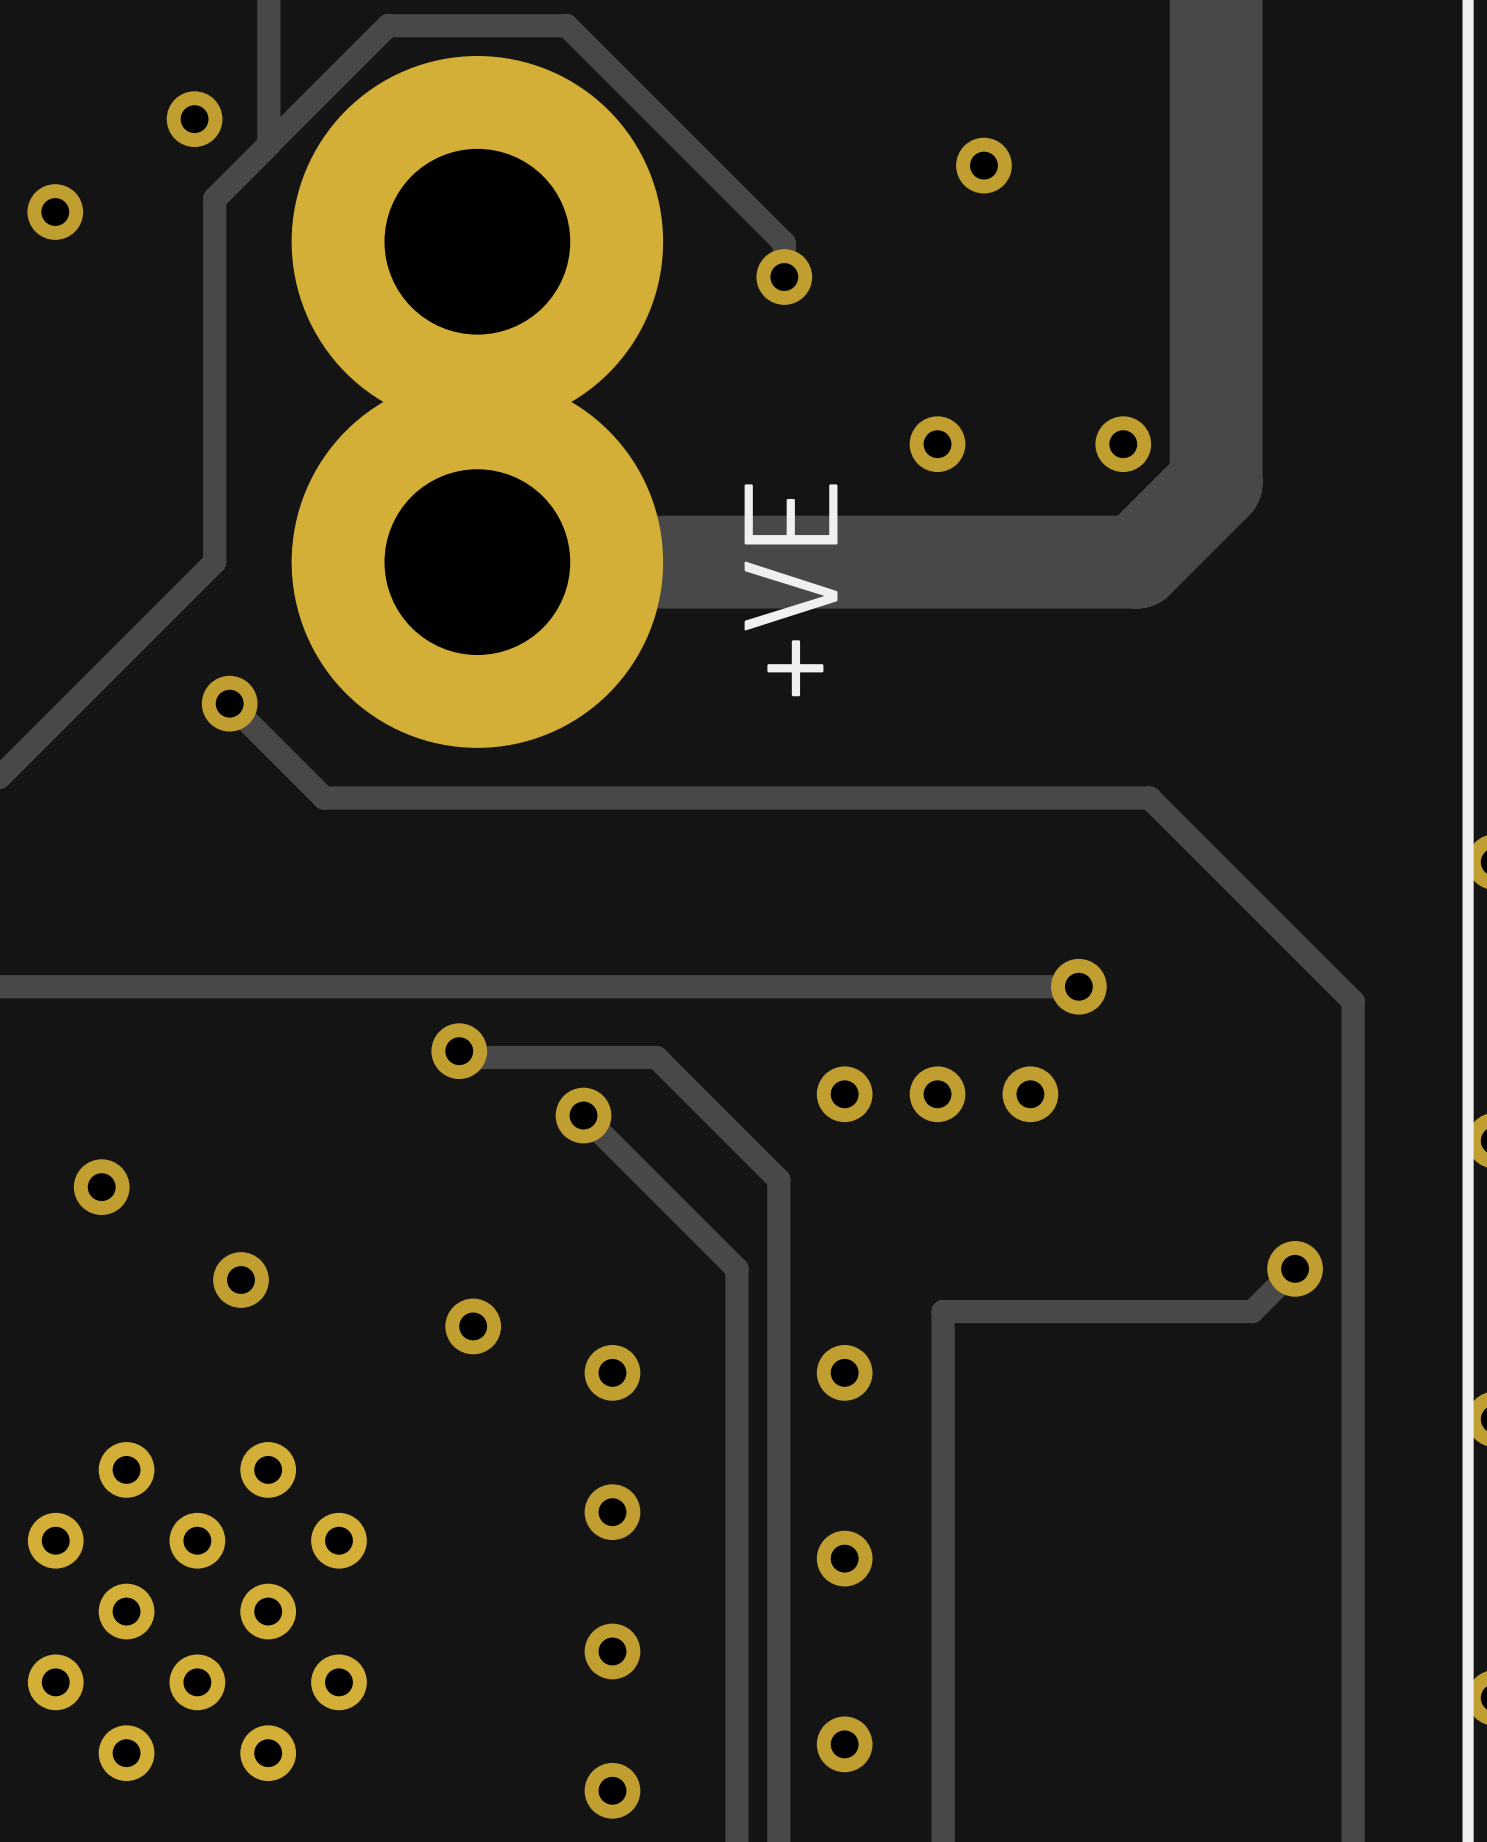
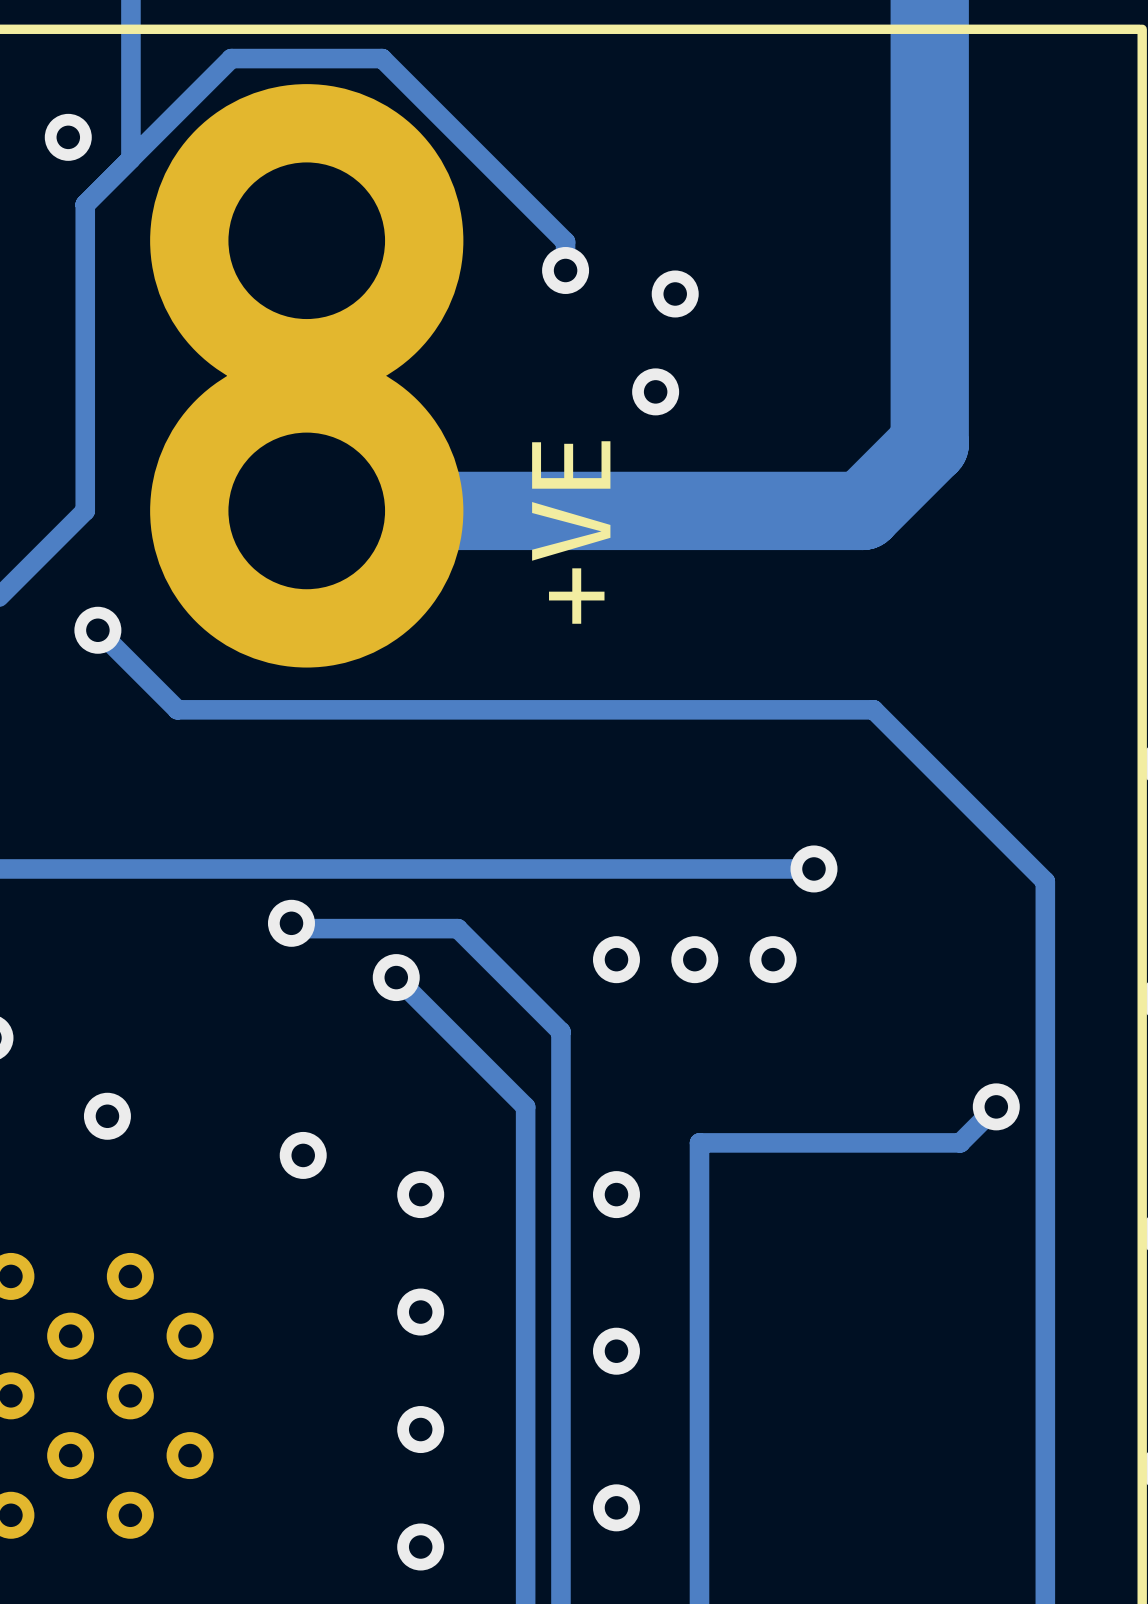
via: (983, 165) -> none
via: none -> (675, 293)
via position: (937, 444) -> (655, 391)
via: (1123, 444) -> none

